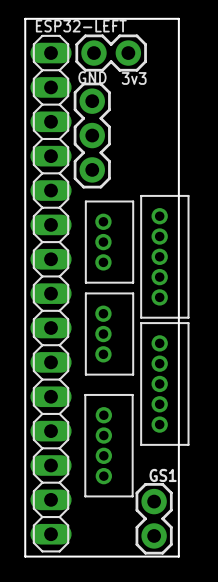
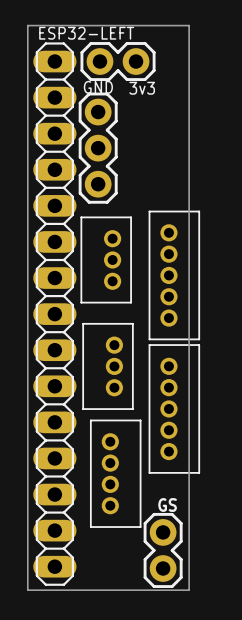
part rotation: 0° (109, 242) -> 180° (106, 259)
part rotation: 0° (109, 334) -> 180° (108, 366)
GS1 name: GS1 (163, 475) -> GS (167, 505)

